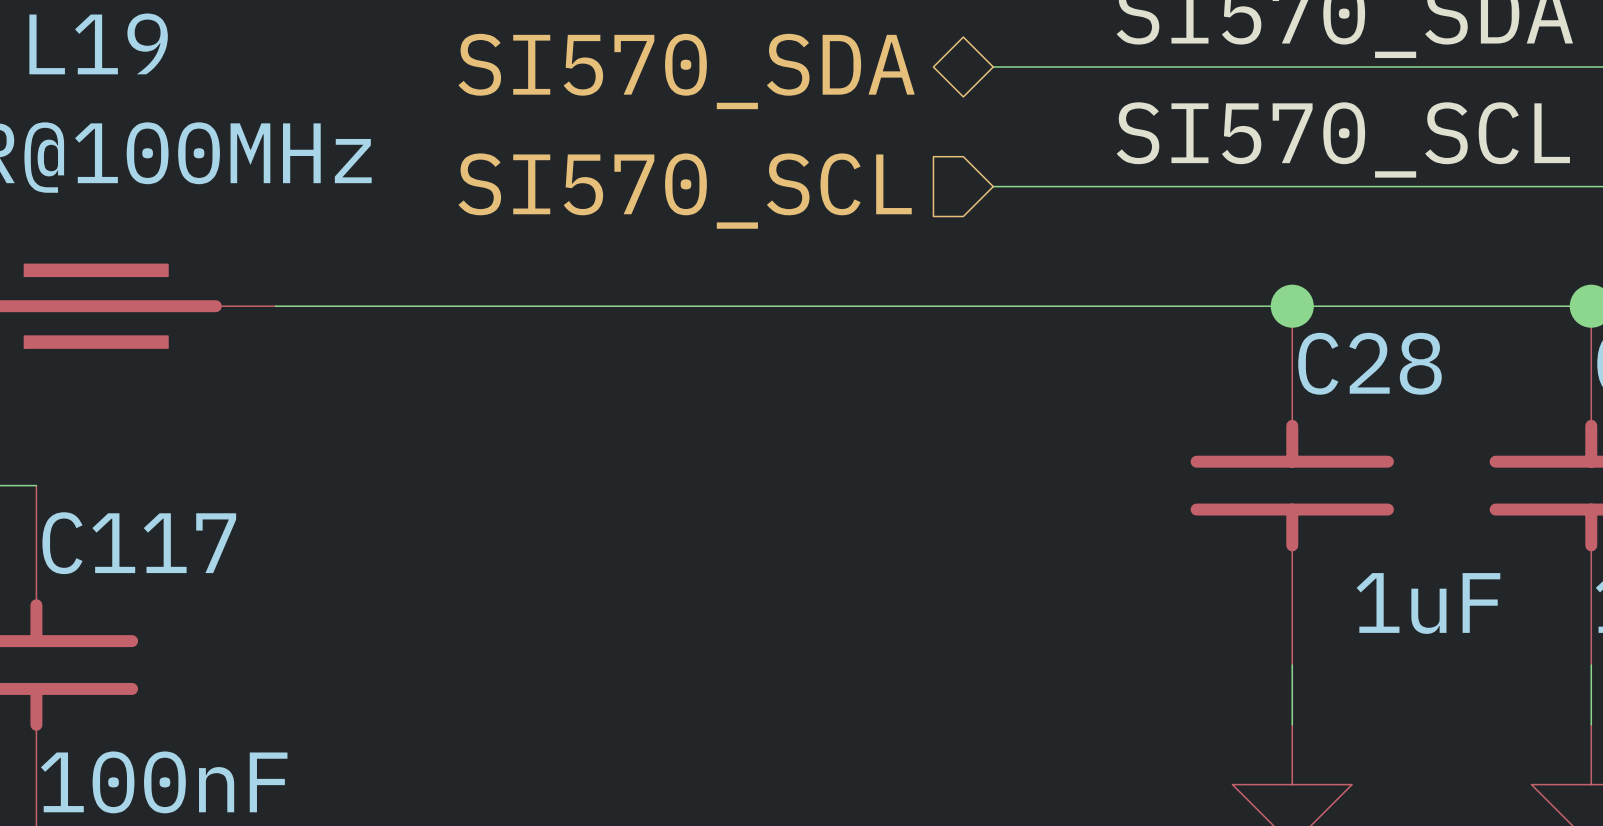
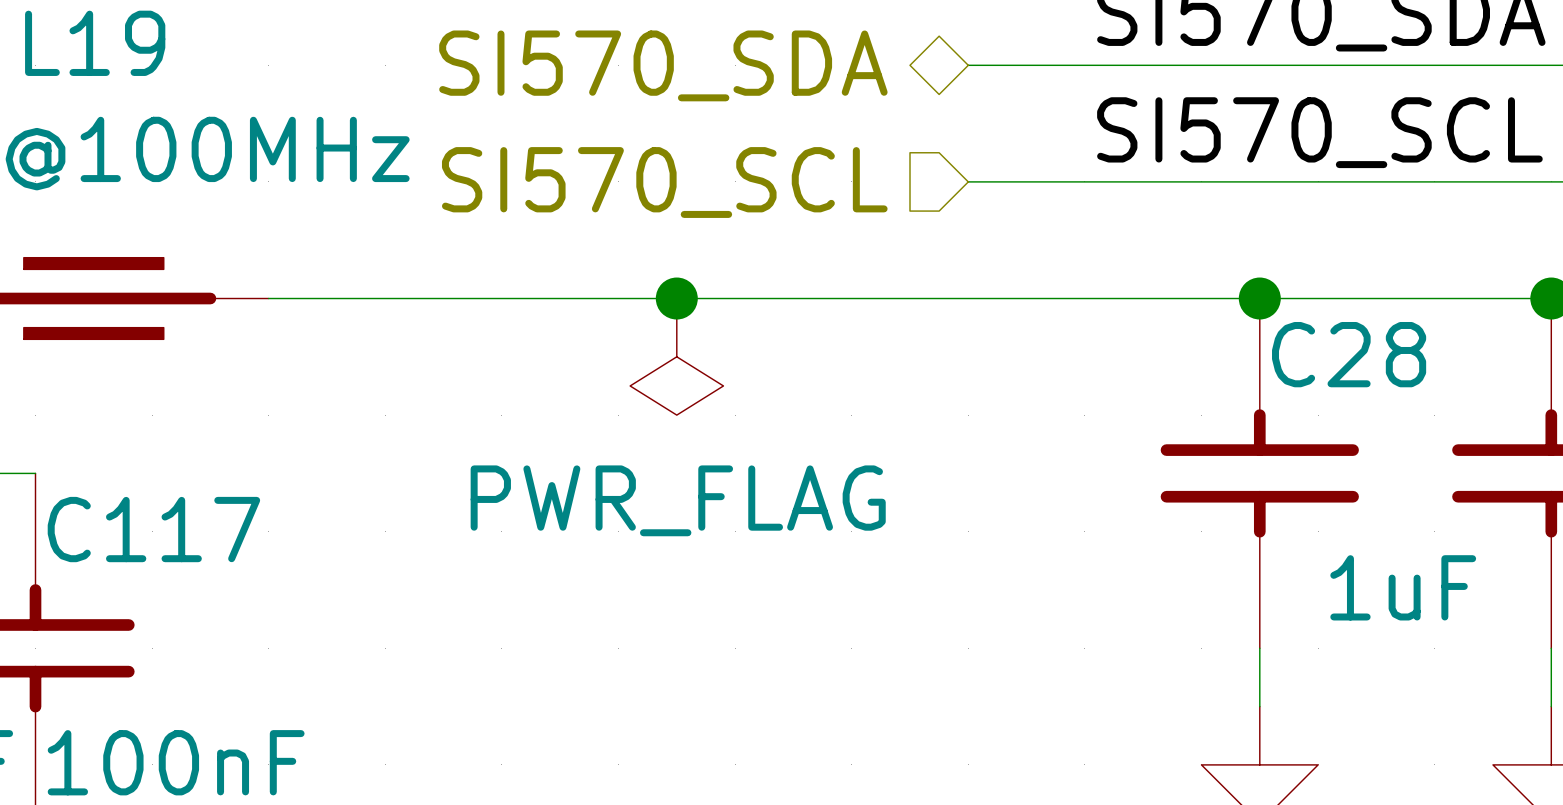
junction: none -> (676, 298)
power symbol: none -> PWR_FLAG (676, 356)

